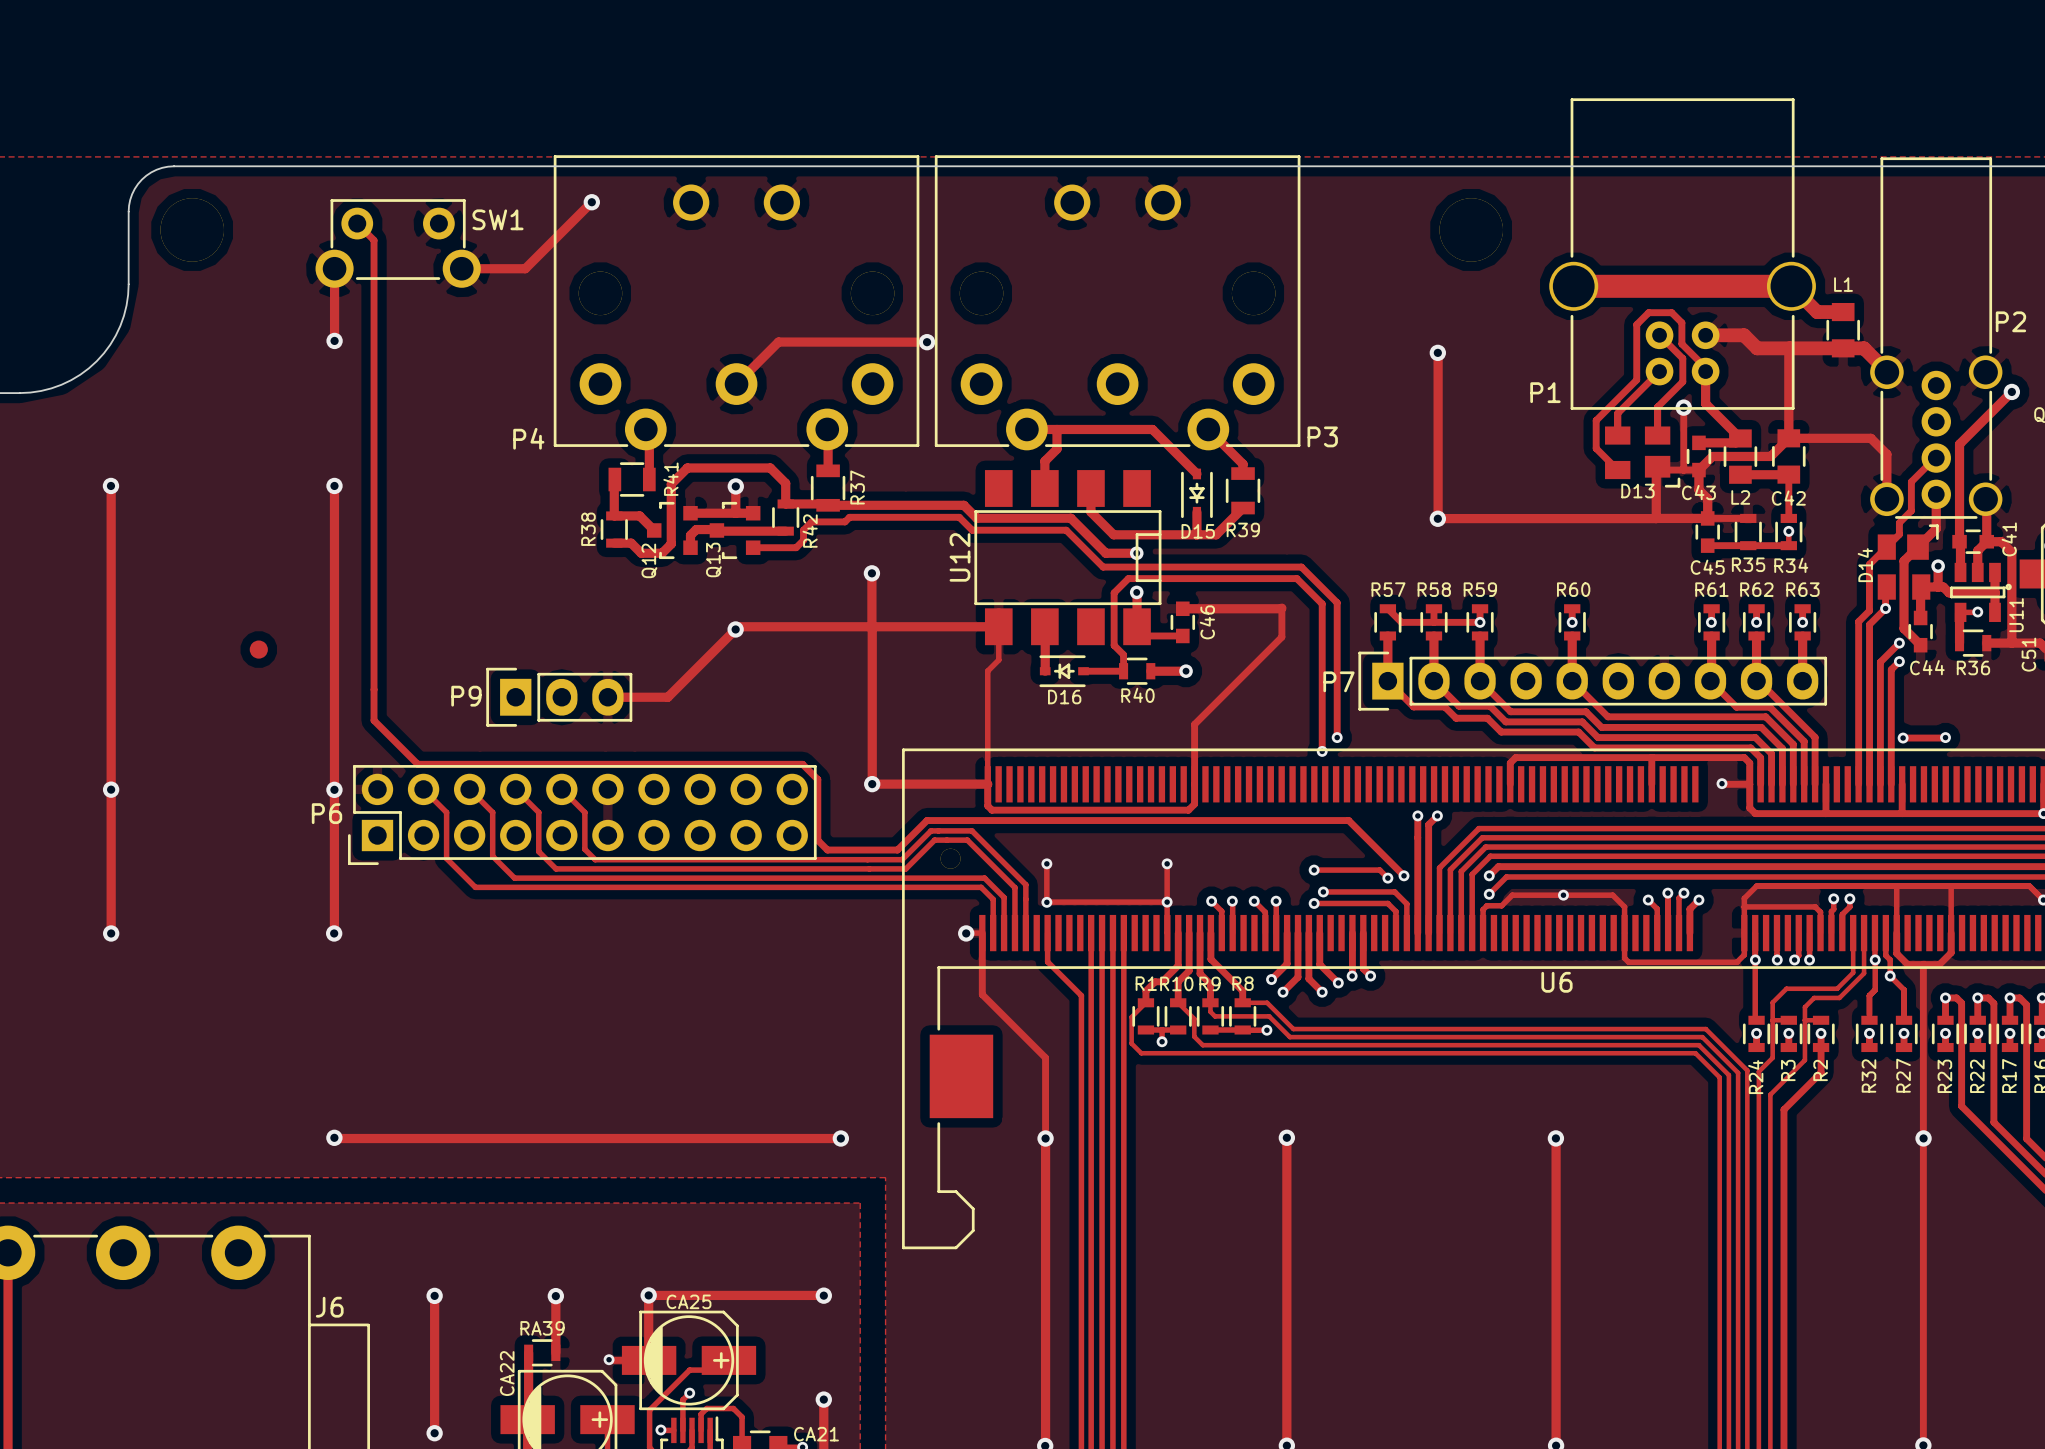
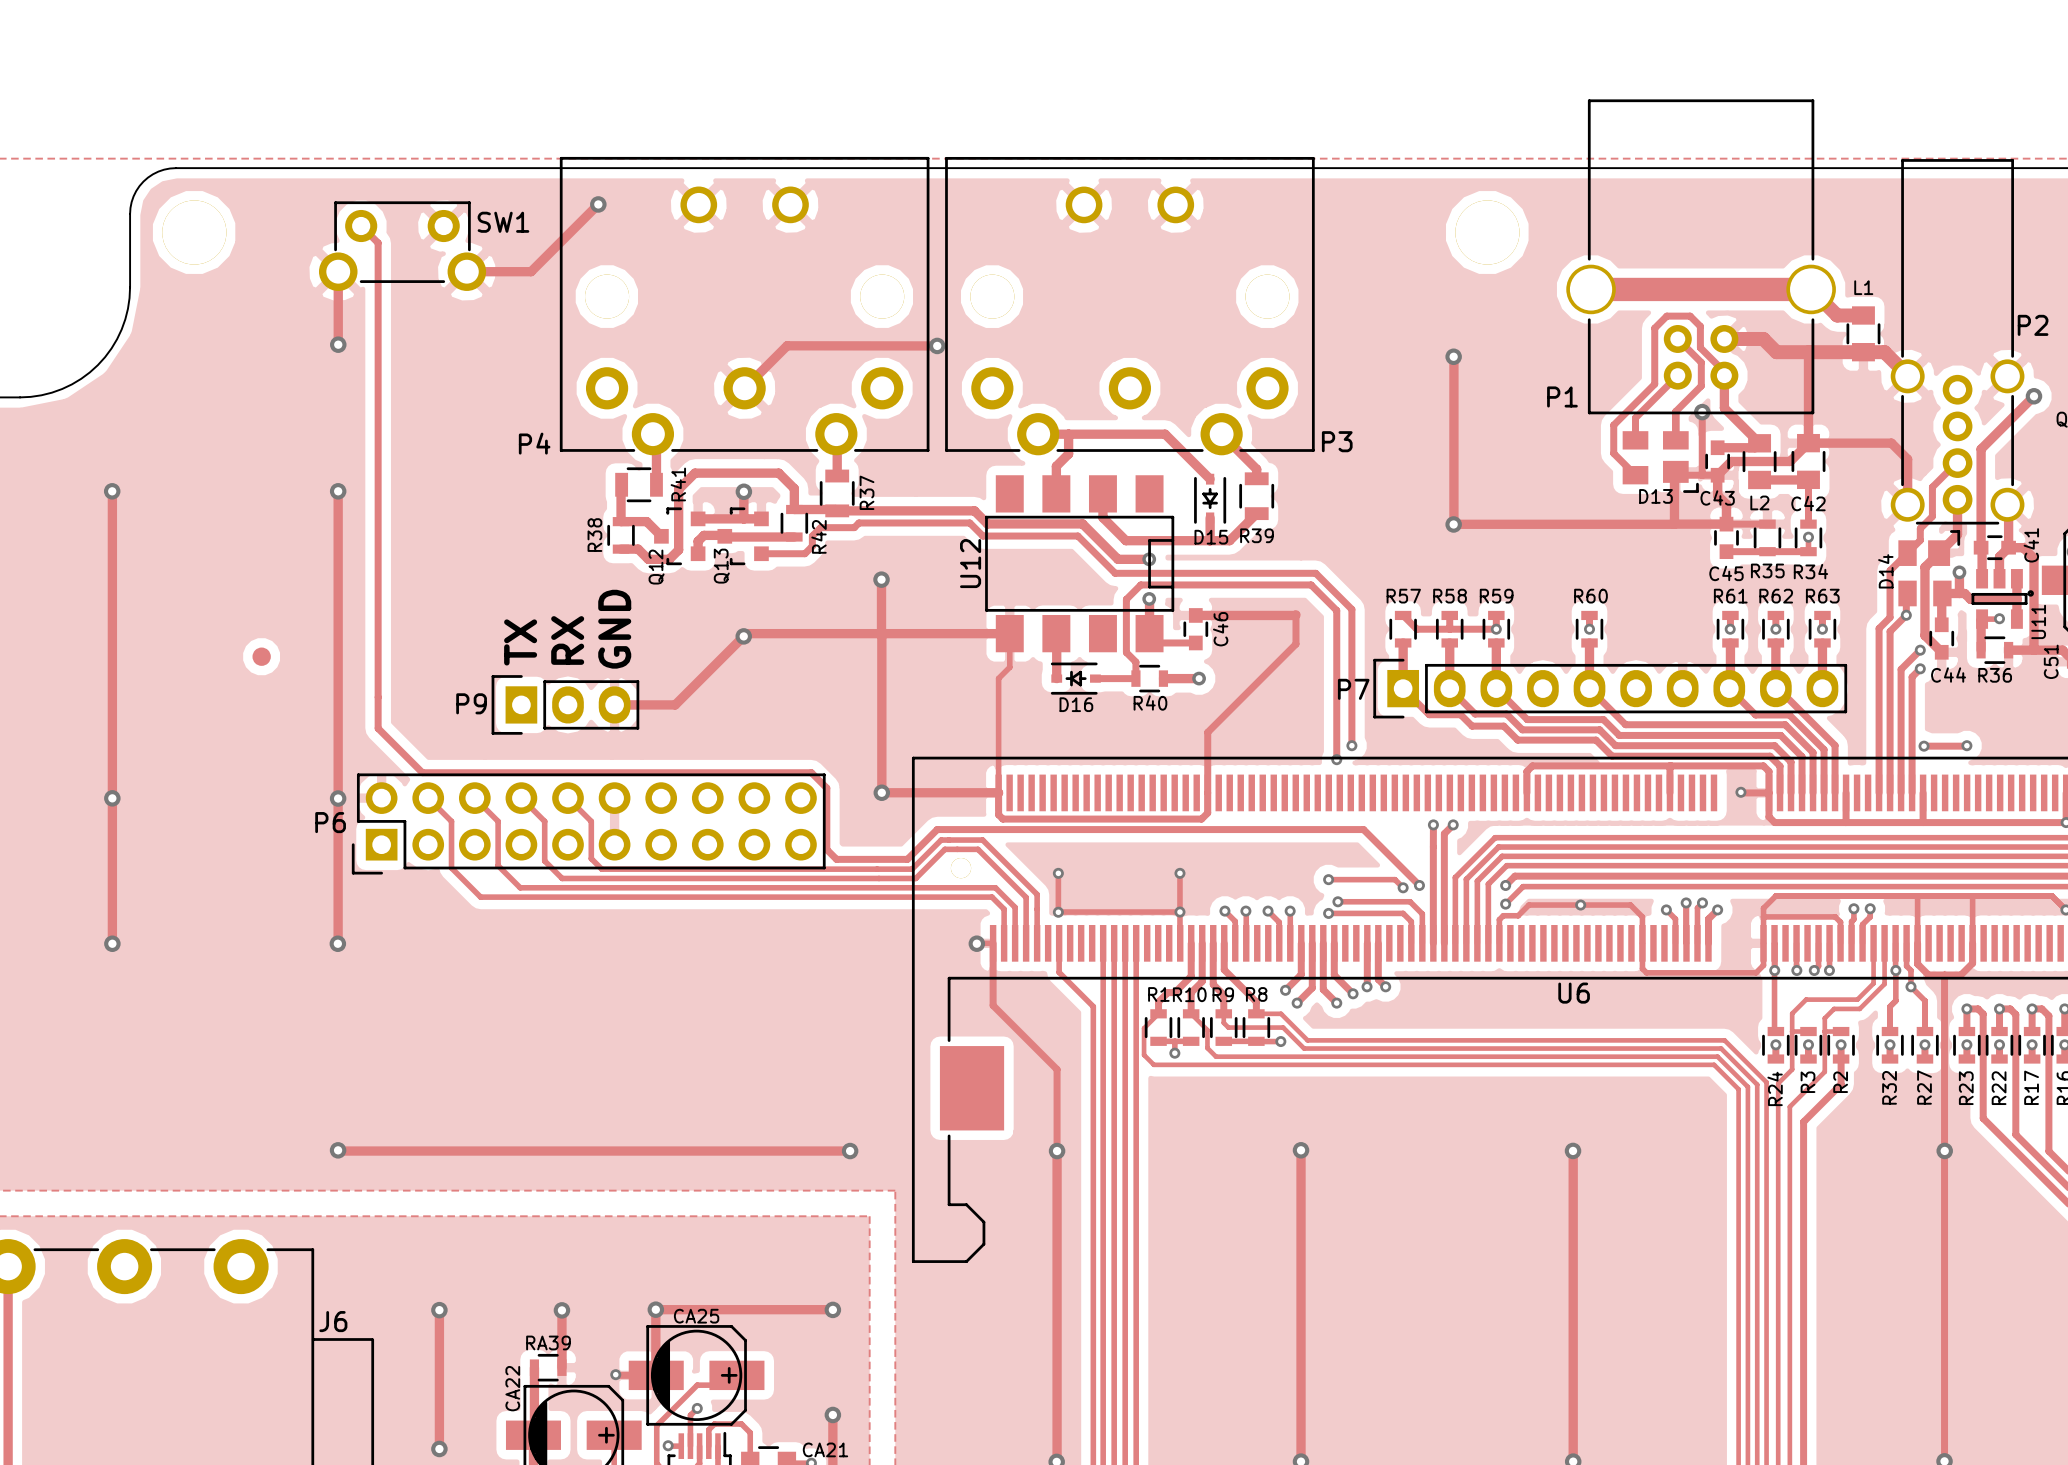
text: none -> GND (614, 629)
text: none -> RX (567, 640)
text: none -> TX (520, 642)

